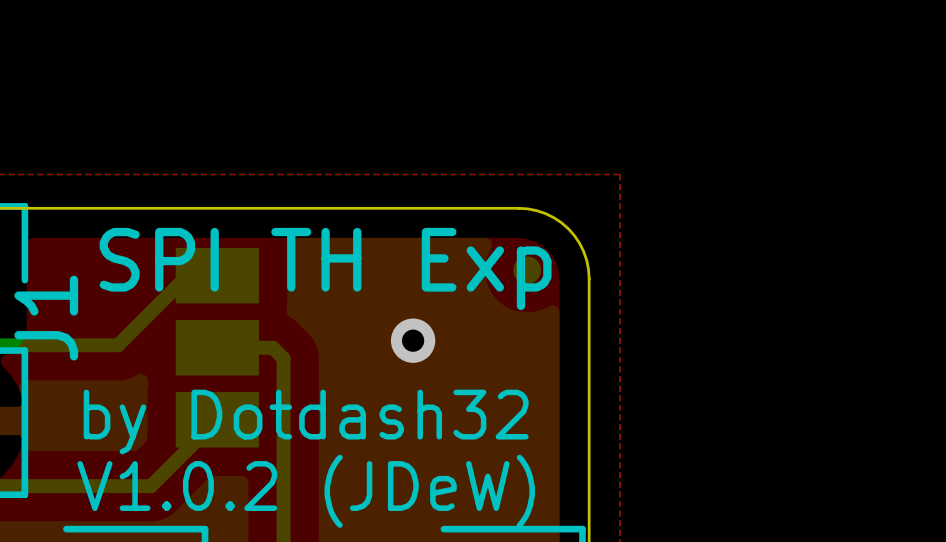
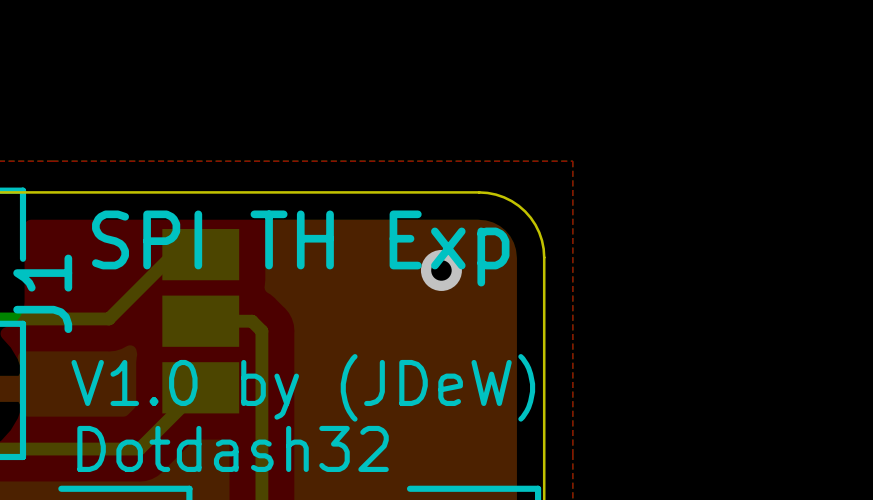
via position: (413, 340) -> (441, 270)
text: by Dotdash32 (306, 421) -> V1.0 by (JDeW) (303, 387)
text: V1.0.2 (JDeW) (306, 491) -> Dotdash32 (233, 448)

